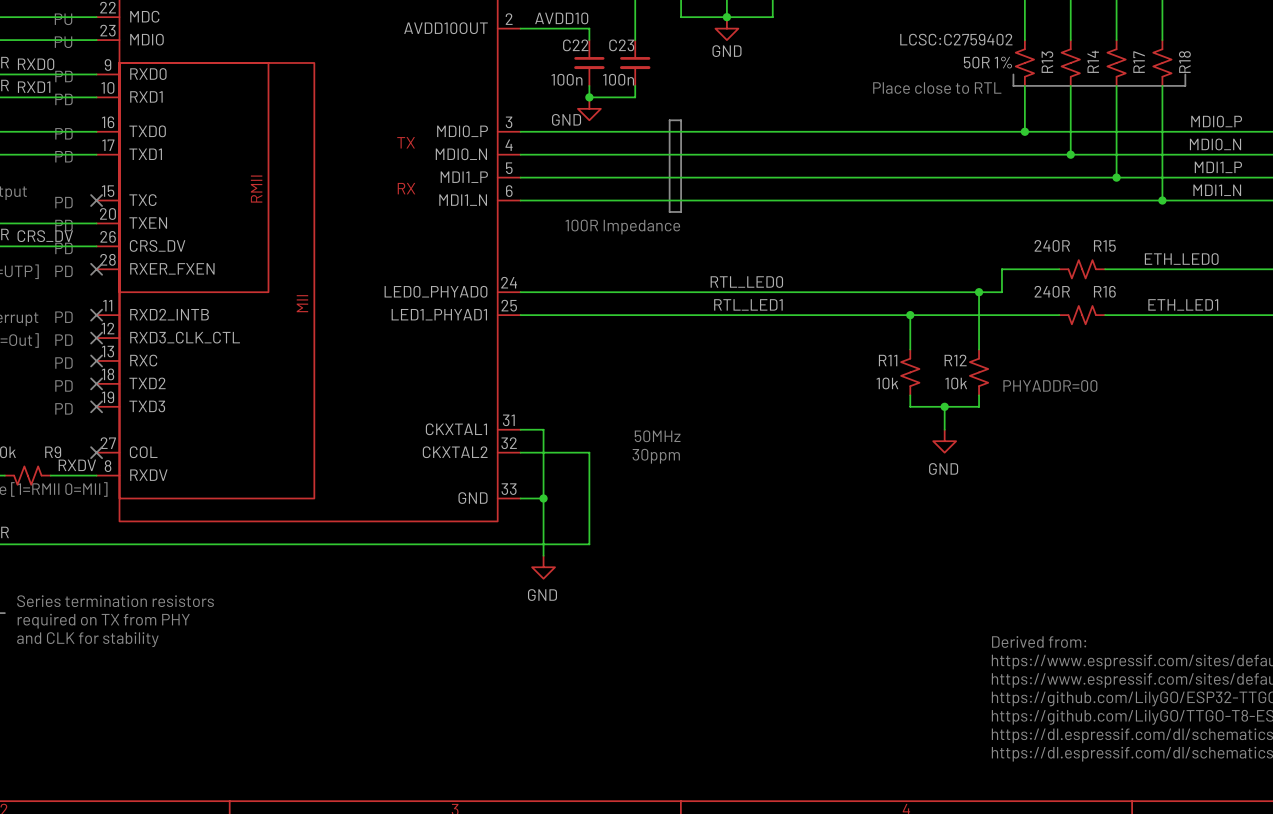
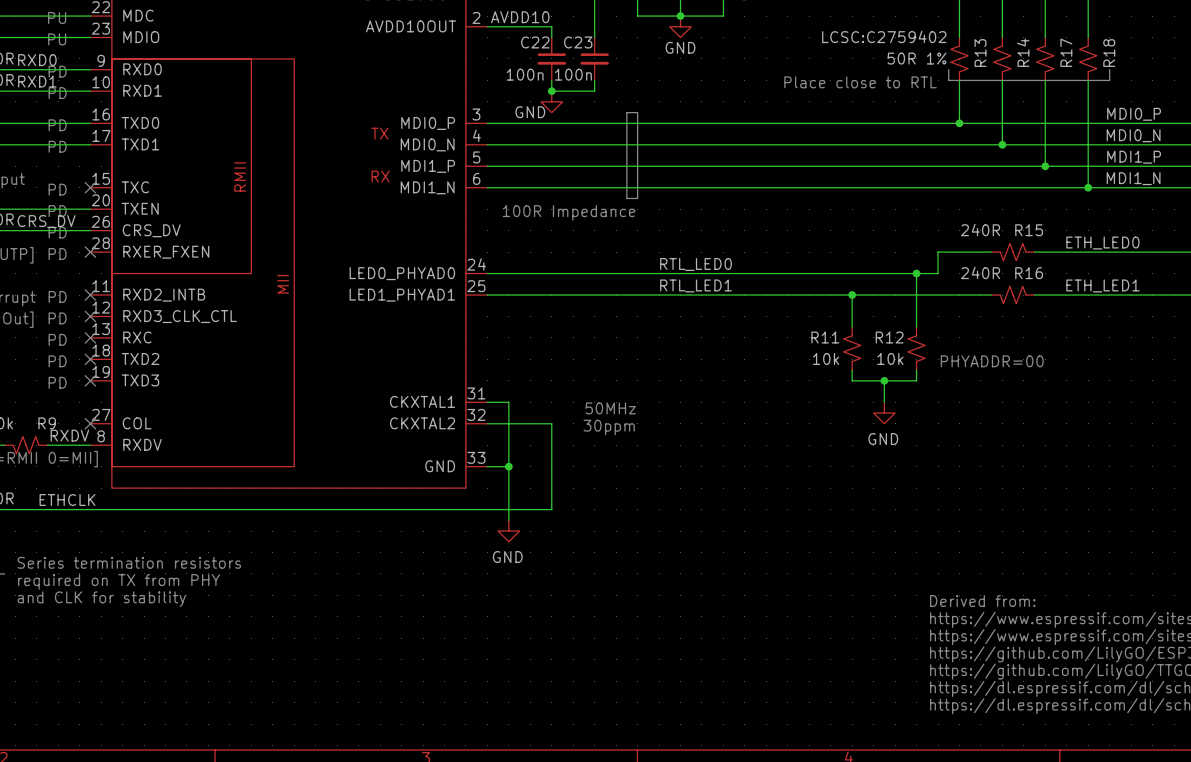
label: none -> ETHCLK (67, 500)

